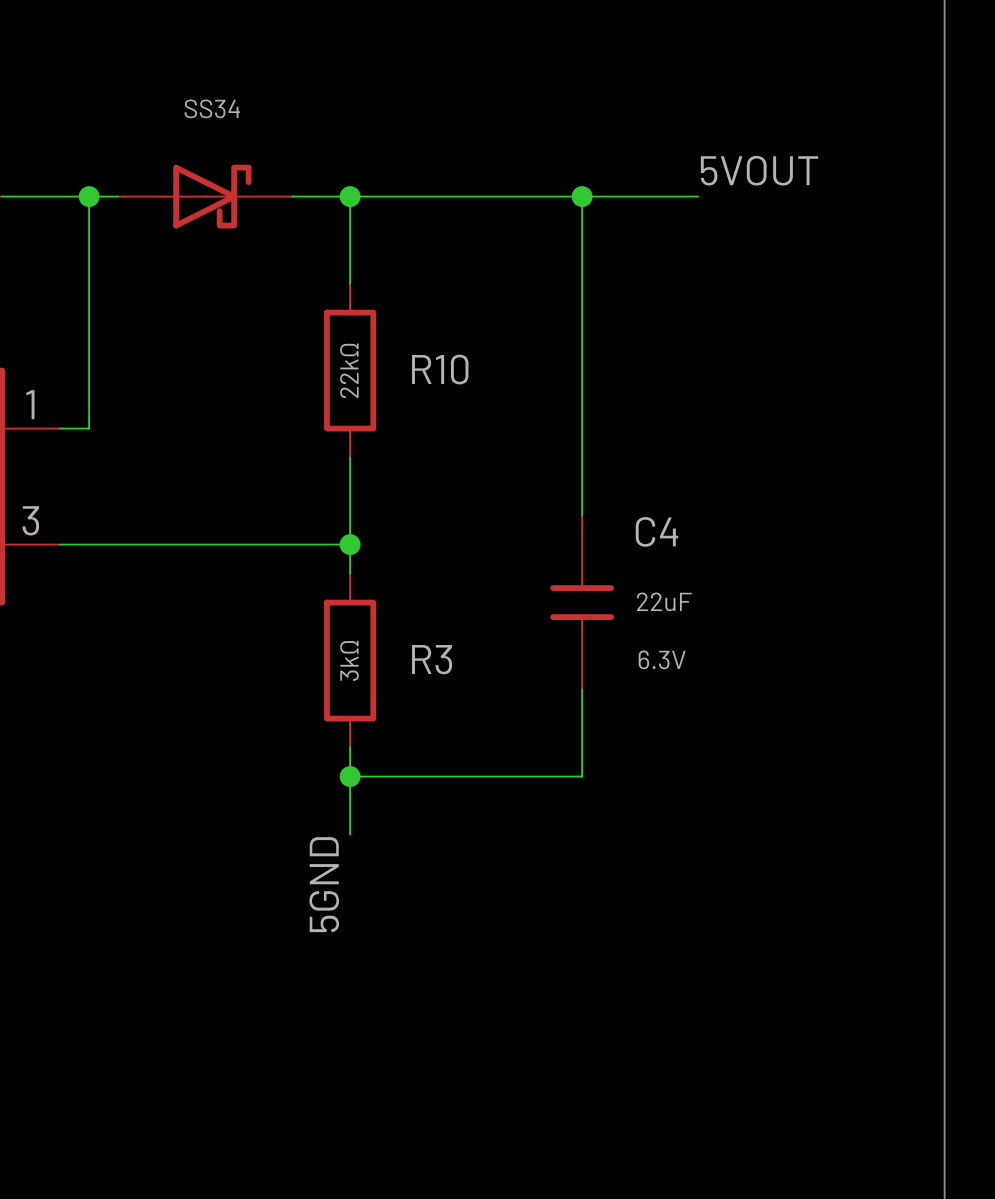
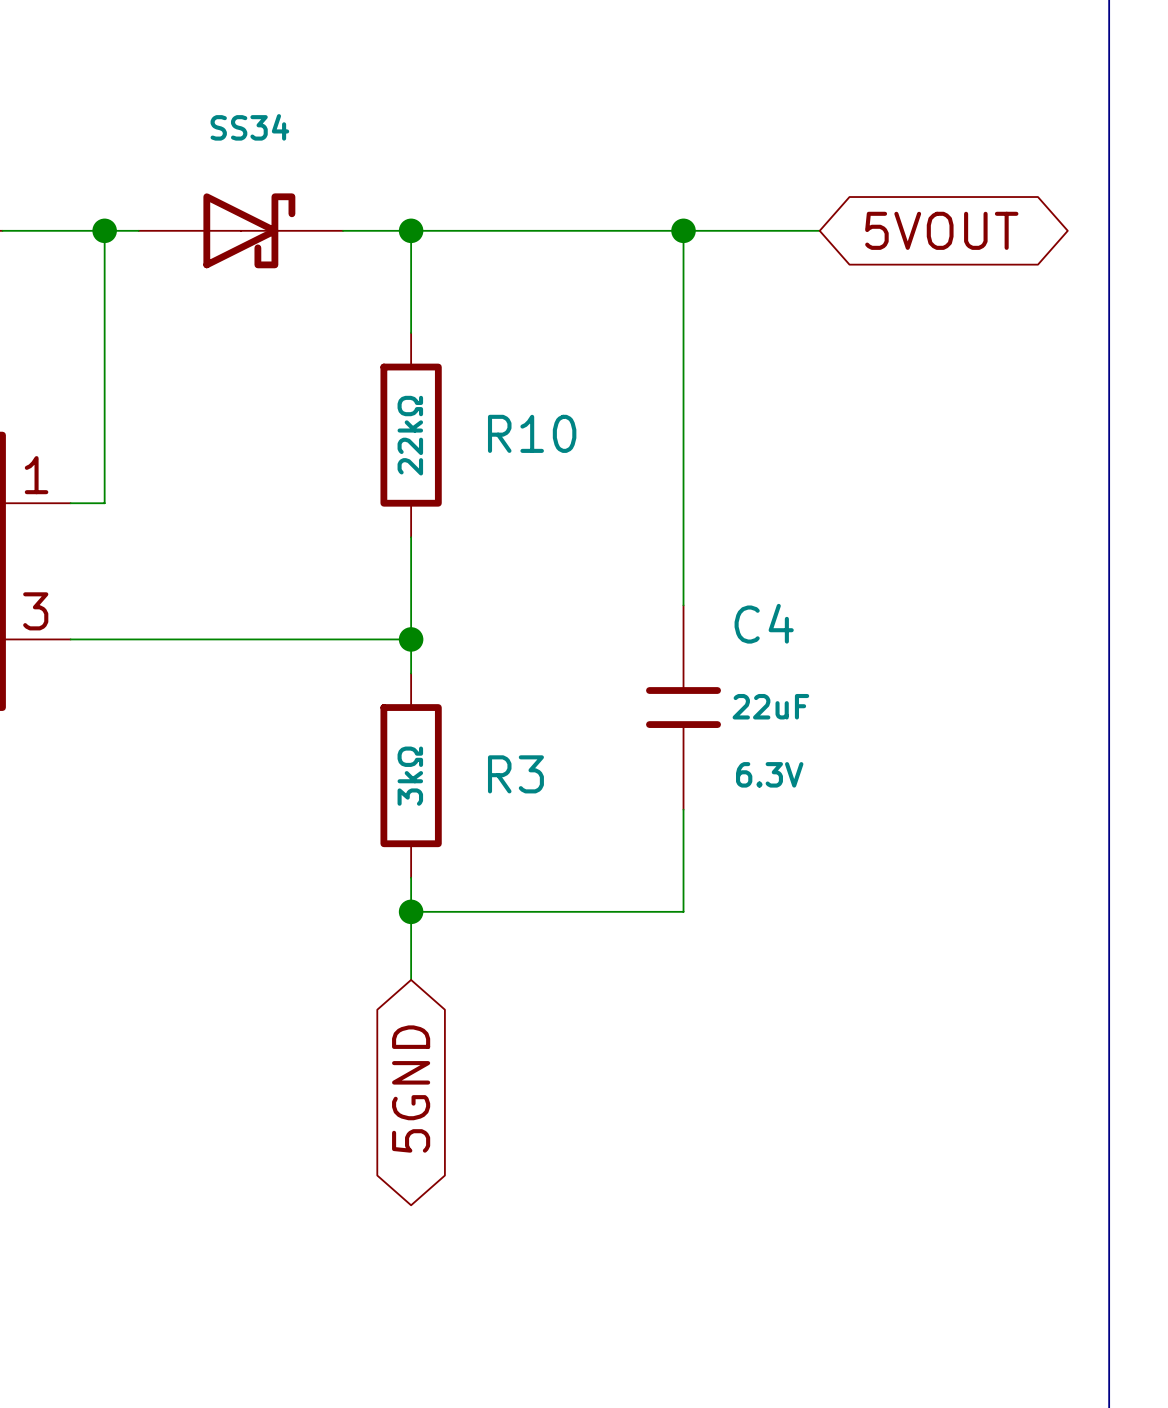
label: 5VOUT (759, 170) -> none
global label: none -> 5VOUT (941, 230)
label: 5GND (324, 884) -> none
global label: none -> 5GND (411, 1089)

